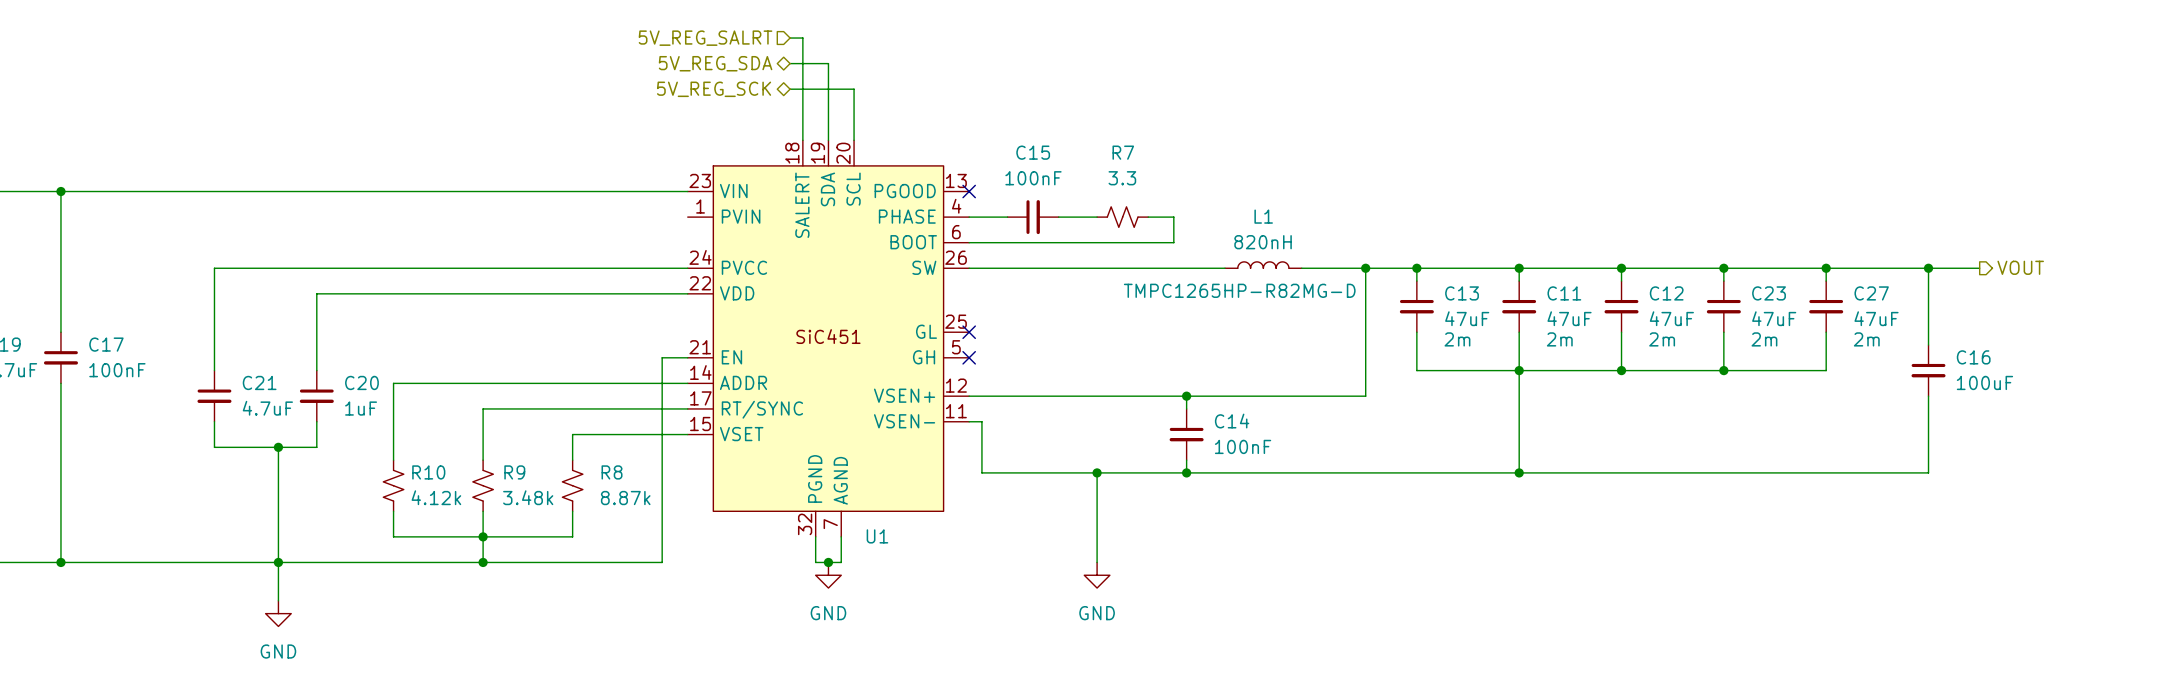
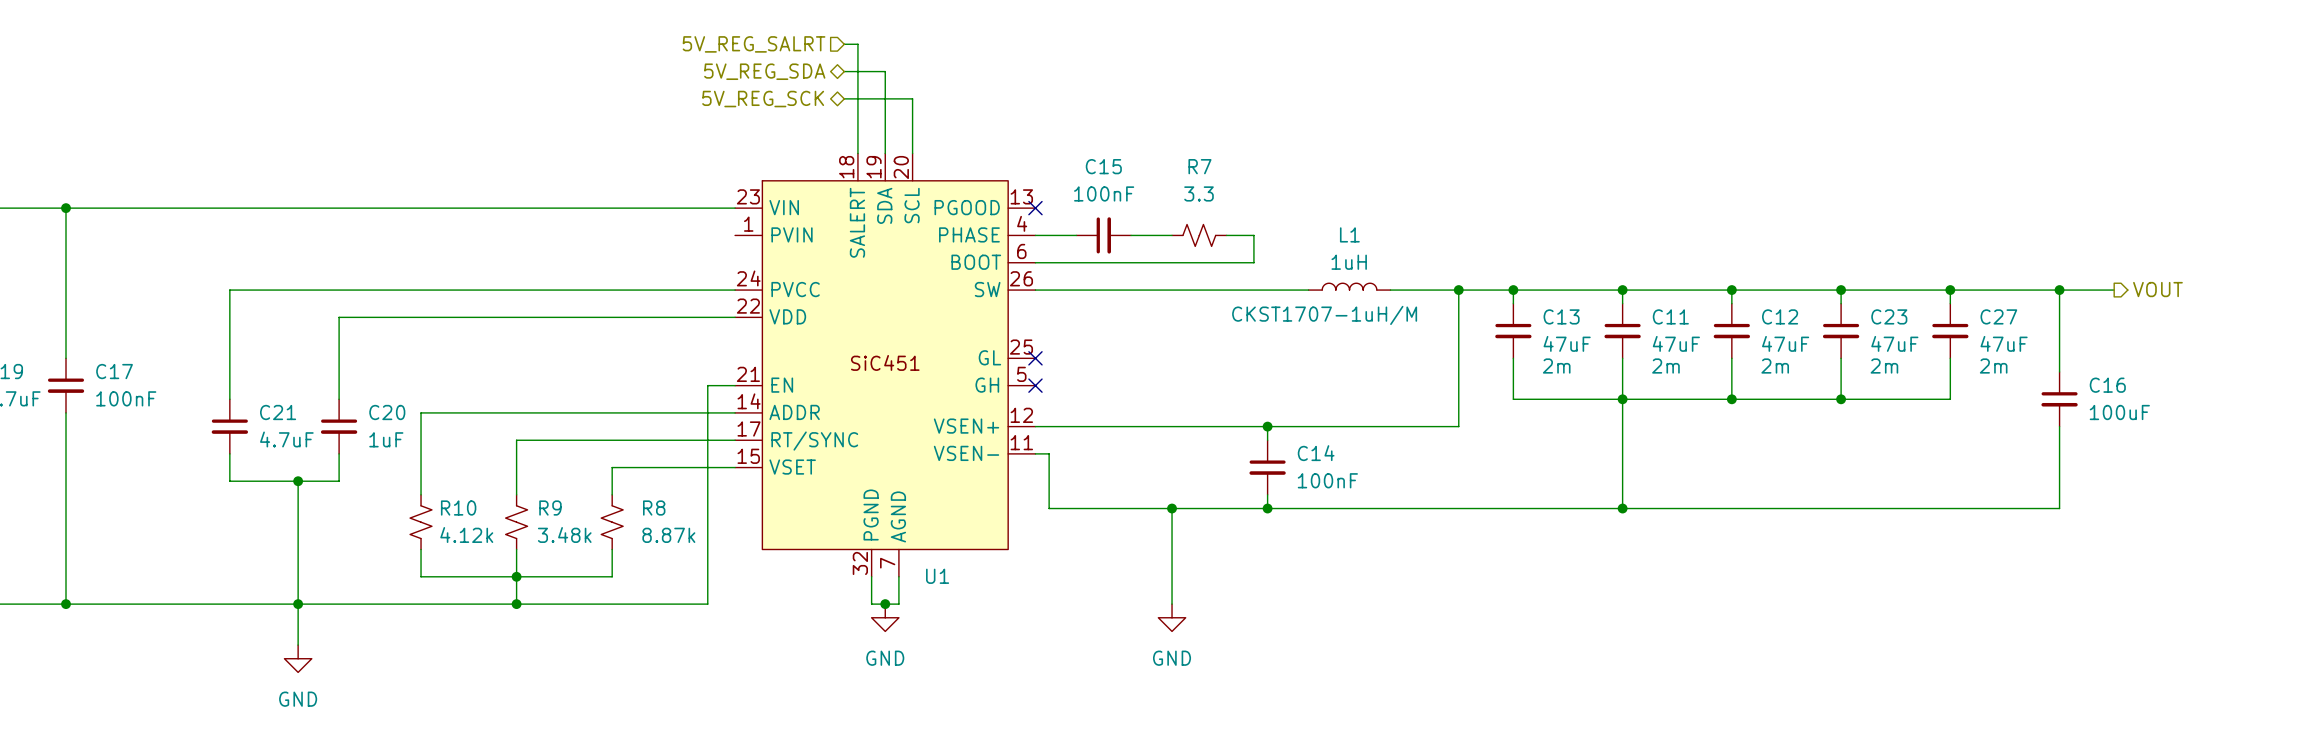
L1 value: 820nH (1263, 242) -> 1uH (1349, 262)
L1 text: TMPC1265HP-R82MG-D (1239, 290) -> CKST1707-1uH/M (1324, 315)

